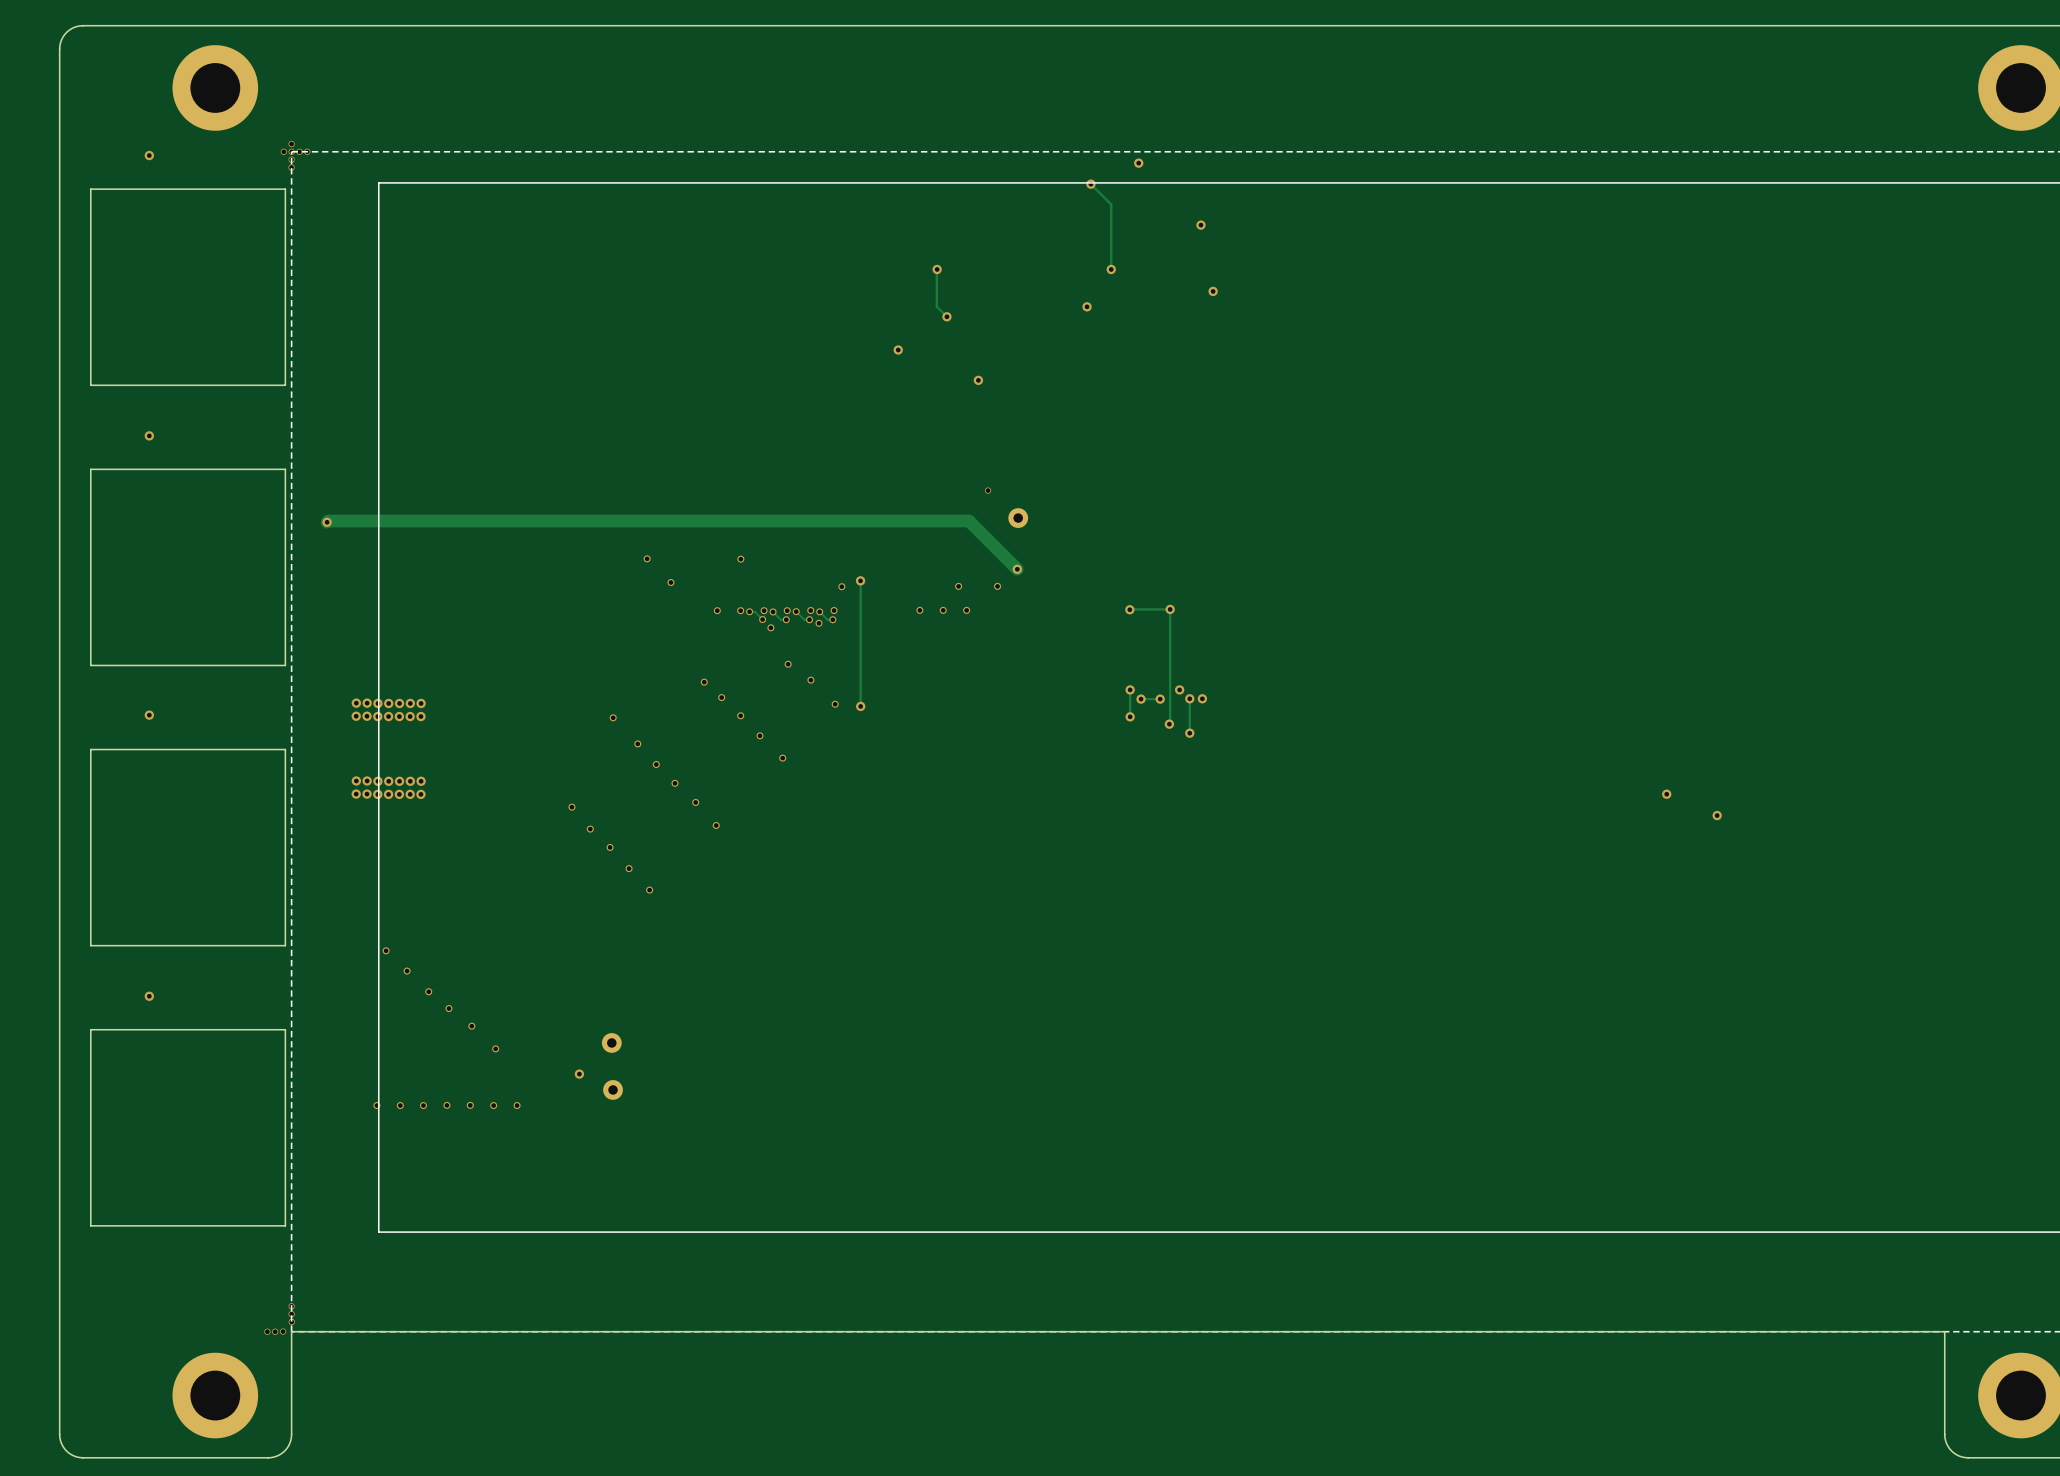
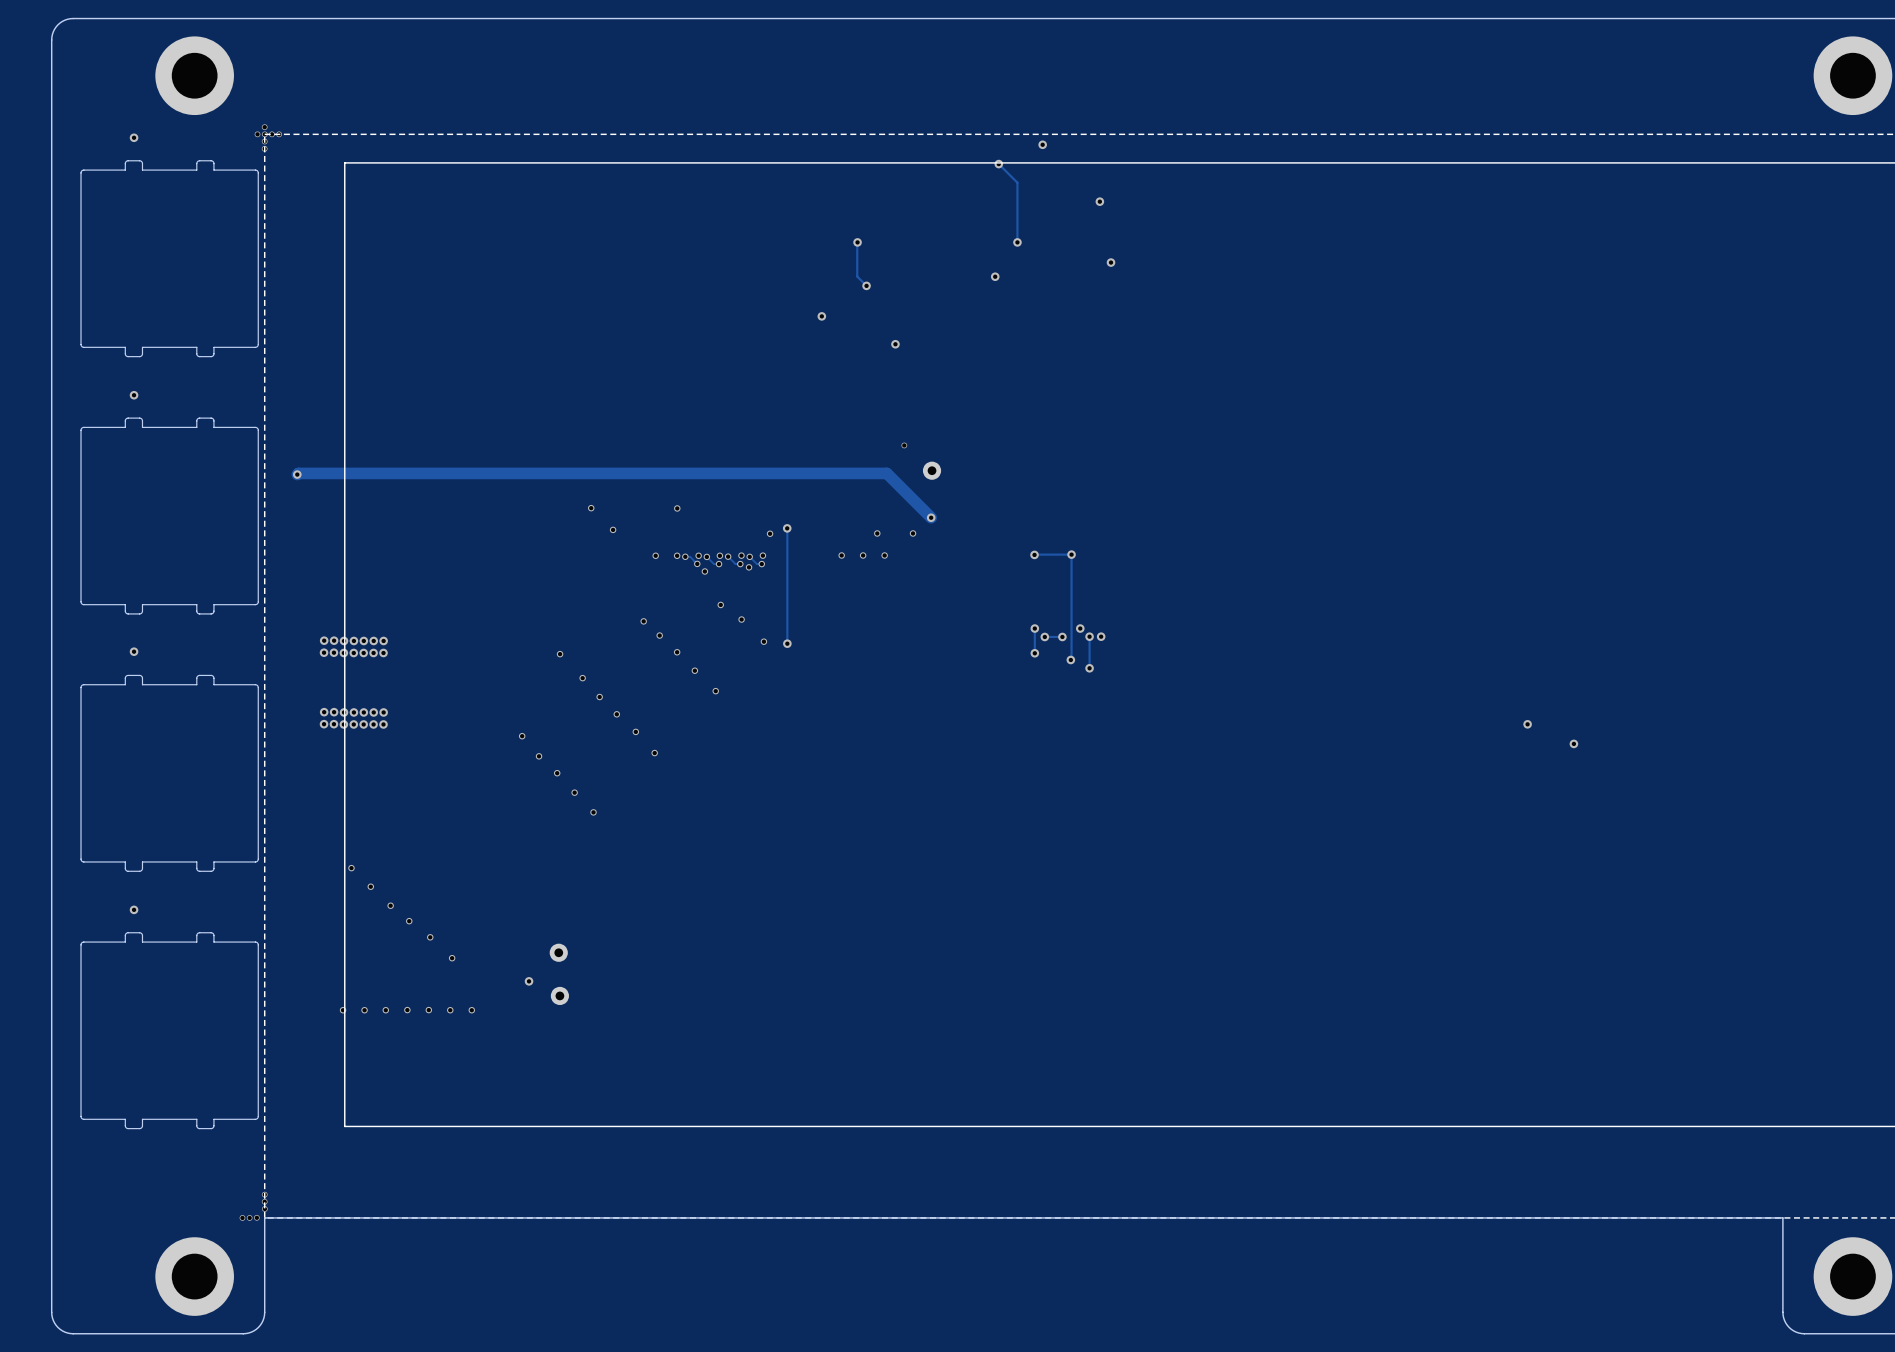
board edge: (90, 189) (90, 385) (285, 385) (285, 189) (90, 189) -> none
part: none -> (169, 258)
board edge: (90, 469) (90, 665) (285, 665) (285, 469) (90, 469) -> none
part: none -> (169, 516)
board edge: (90, 749) (90, 945) (285, 945) (285, 749) (90, 749) -> none
part: none -> (169, 773)
board edge: (90, 1029) (285, 1029) (285, 1225) (90, 1225) (90, 1029) -> none
part: none -> (169, 1030)

